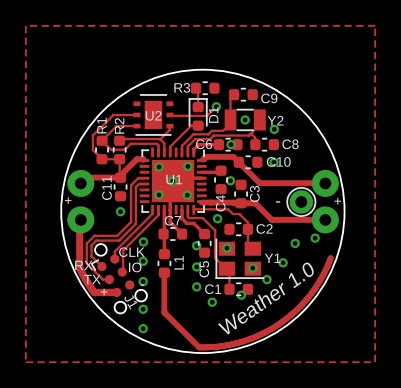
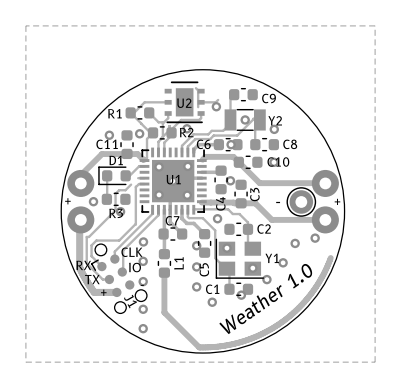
R3 name position: R3 (182, 87) -> R3 (116, 213)
R3 position: (205, 88) -> (116, 199)
track: none -> (218, 99) (215, 102) (201, 102)
track: none -> (168, 102) (144, 102) (134, 112) (130, 112) (150, 132) (153, 132) (147, 138) (147, 158) (144, 160)
track: (216, 106) (207, 115) (169, 114) -> none
track: none -> (149, 112) (158, 122) (164, 122) (168, 118) (168, 113)
track: (137, 114) (113, 114) (92, 135) (92, 150) (102, 159) (119, 159) (120, 177) (136, 159) (143, 159) -> none
U2 position: (153, 114) -> (184, 102)
D1 rotation: 0° (198, 114) -> 90° counterclockwise (114, 175)
D1 position: (198, 114) -> (114, 175)
track: (259, 119) (259, 124) (249, 135) (237, 135) -> none
R1 name position: R1 (101, 125) -> R1 (114, 113)
track: (201, 125) (191, 125) (170, 146) (170, 152) -> none
track: (137, 126) (116, 126) (102, 140) (111, 149) (124, 149) (130, 143) (158, 145) -> (162, 122) (162, 137) (158, 141) (158, 145)
via: none -> (186, 128)
via: none -> (139, 133)
track: (250, 134) (255, 137) (255, 144) -> (237, 135) (253, 118) (255, 120) (255, 144)
via: none -> (109, 135)
track: (119, 140) (122, 139) (160, 139) (164, 143) -> (201, 113) (199, 119) (181, 119) (171, 129) (171, 135) (164, 143)
R1 rotation: 0° (102, 149) -> 90° clockwise (139, 112)
R1 position: (102, 149) -> (139, 112)
R2 rotation: 0° (119, 149) -> 90° clockwise (162, 132)
R2 position: (119, 149) -> (162, 132)
track: none -> (144, 166) (139, 166) (129, 175) (125, 175)
track: none -> (107, 175) (106, 199)
track: (120, 177) (86, 177) (80, 183) -> (144, 159) (137, 154) (102, 154) (80, 175) (80, 183)
track: (138, 178) (131, 185) (131, 221) (117, 235) (94, 235) (86, 243) -> (131, 184) (125, 190) (119, 190) (115, 193) (115, 210) (88, 236) (86, 236) (86, 243)
C11 position: (120, 186) -> (127, 144)
C11 name rotation: 0° (106, 188) -> 90° clockwise (107, 144)
via: none -> (93, 201)

